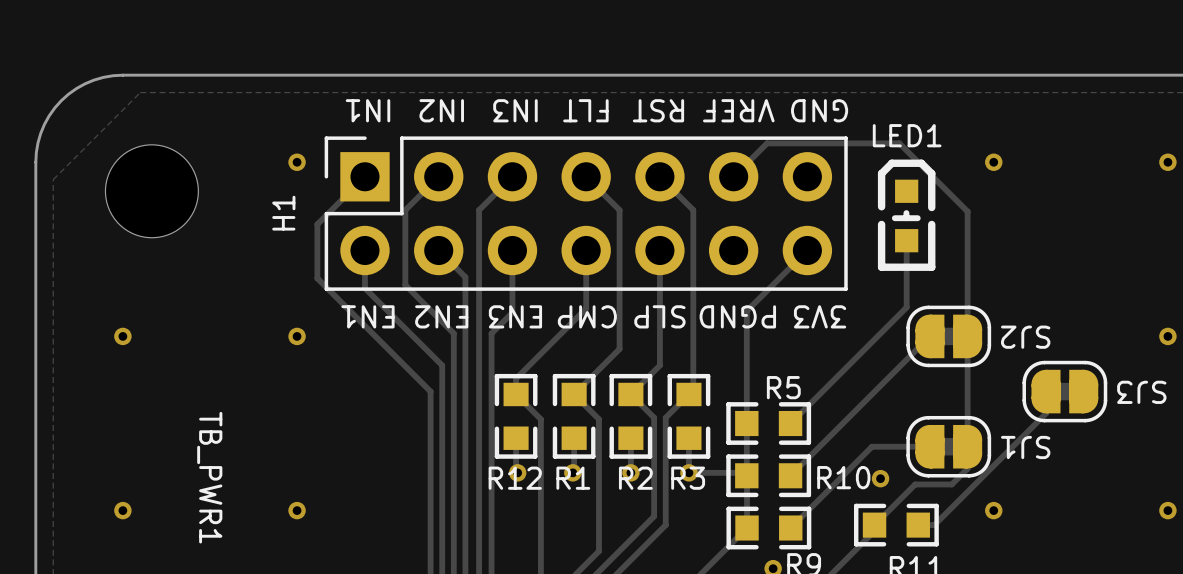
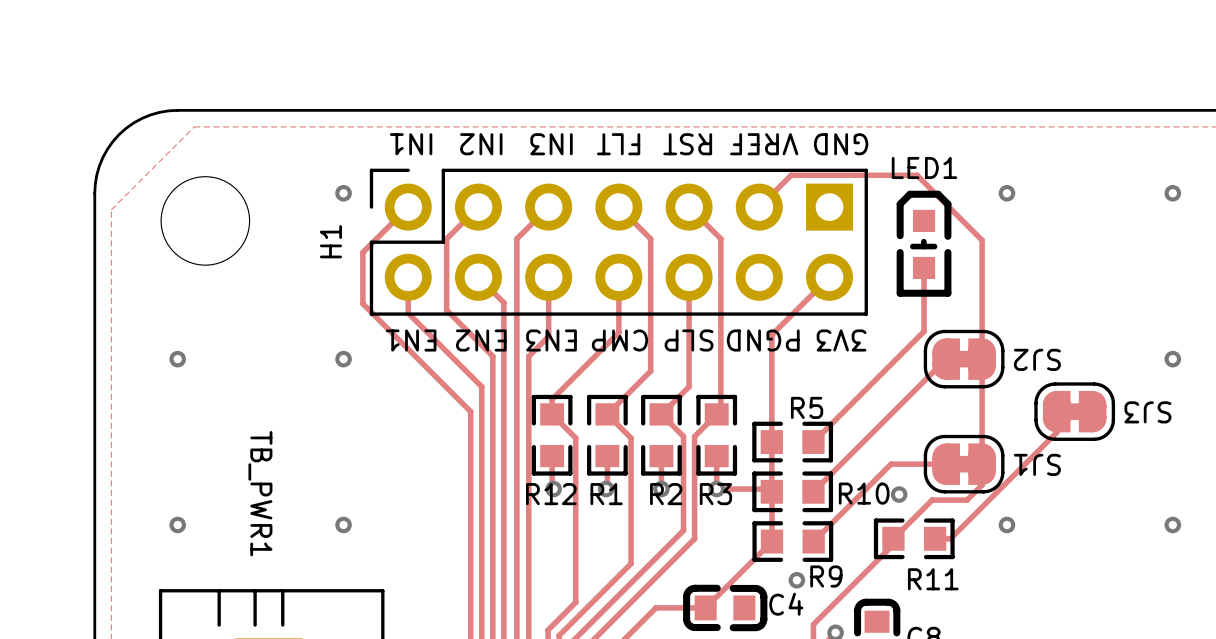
H1 footprint: [324, 136, 848, 291] -> [369, 168, 868, 316]

